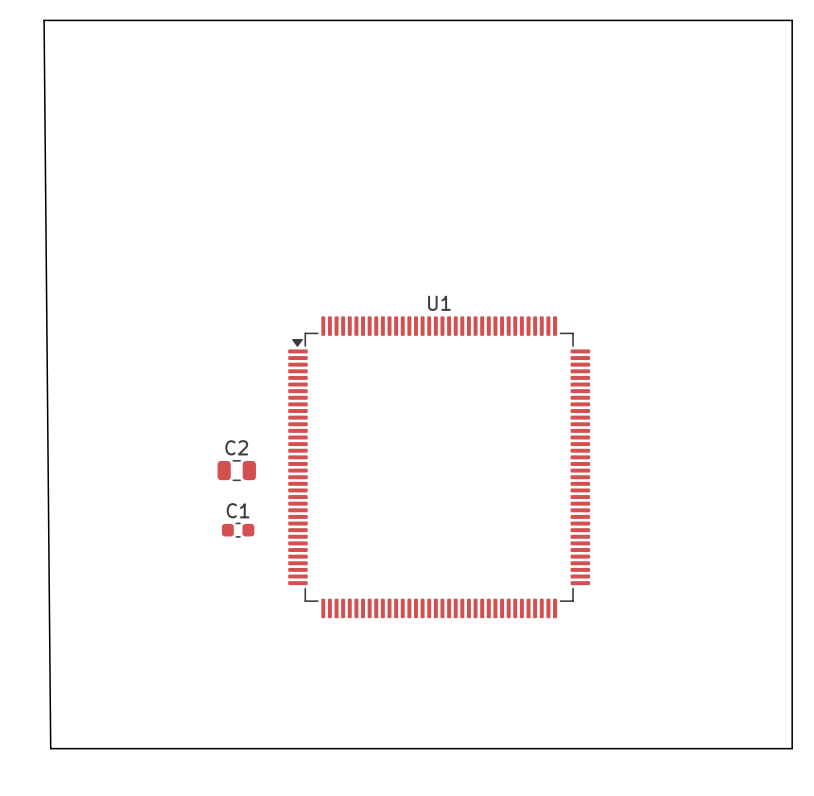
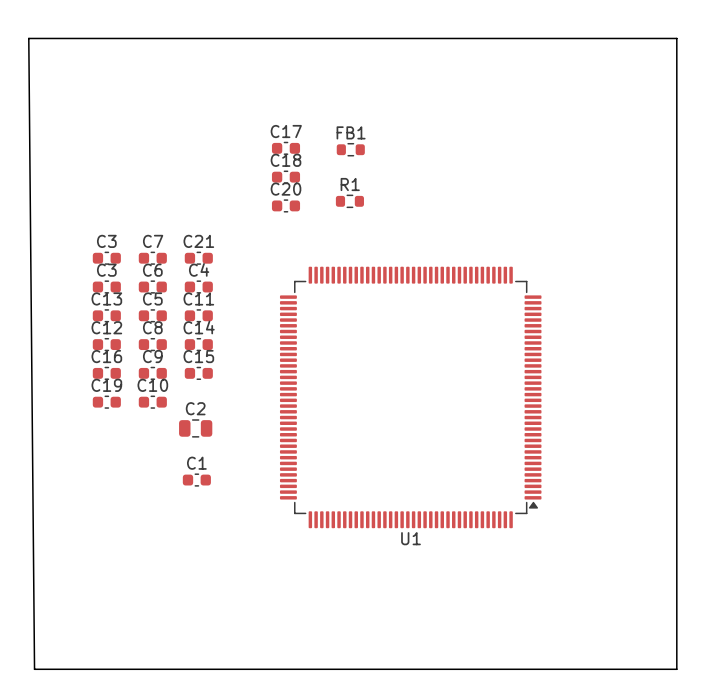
C17: none -> (285, 148)
FB1: none -> (350, 149)
C18: none -> (285, 177)
R1: none -> (349, 201)
C20: none -> (285, 205)
C3: none -> (106, 258)
C7: none -> (152, 258)
C21: none -> (198, 258)
C3: none -> (106, 287)
C6: none -> (152, 287)
C4: none -> (198, 287)
C13: none -> (106, 315)
C5: none -> (152, 315)
C11: none -> (198, 315)
C12: none -> (106, 344)
C8: none -> (152, 344)
C14: none -> (198, 344)
C16: none -> (106, 373)
C9: none -> (152, 373)
C15: none -> (198, 373)
C19: none -> (106, 402)
C10: none -> (152, 402)
U1 rotation: 0° (439, 467) -> 180° (410, 397)

